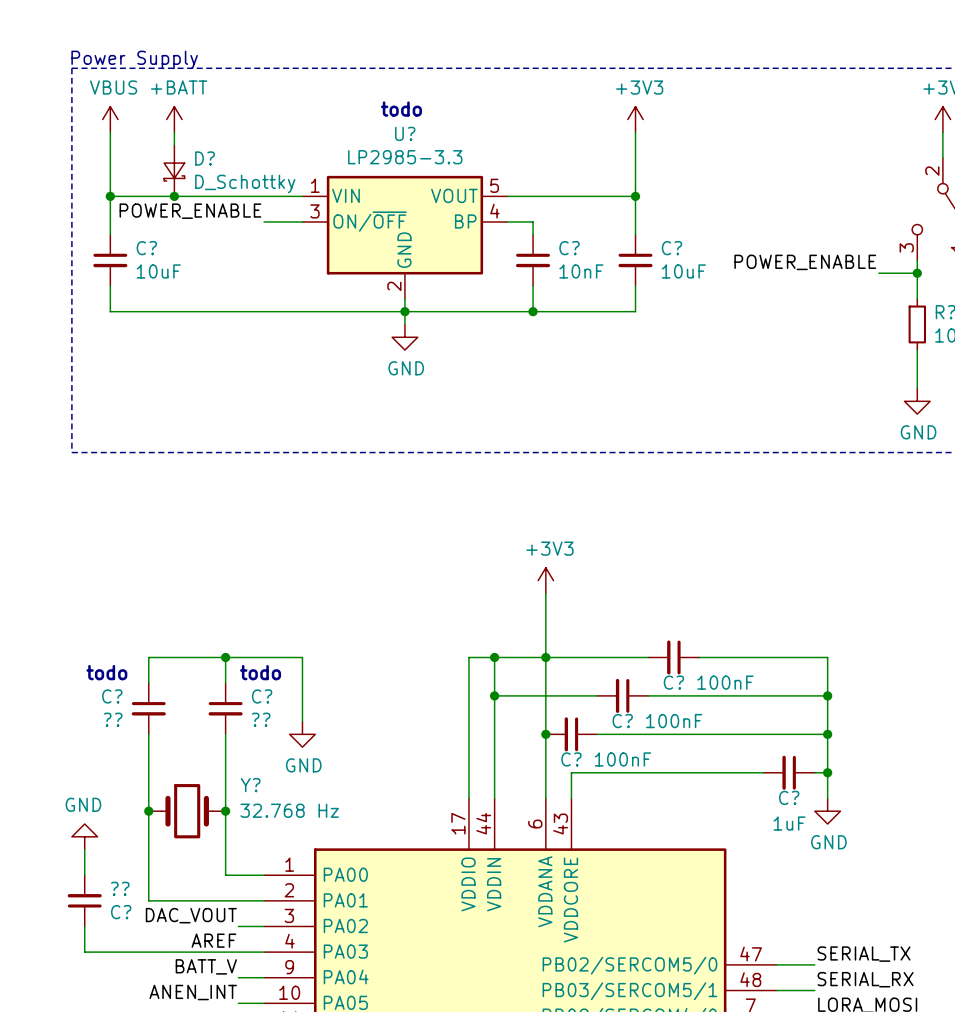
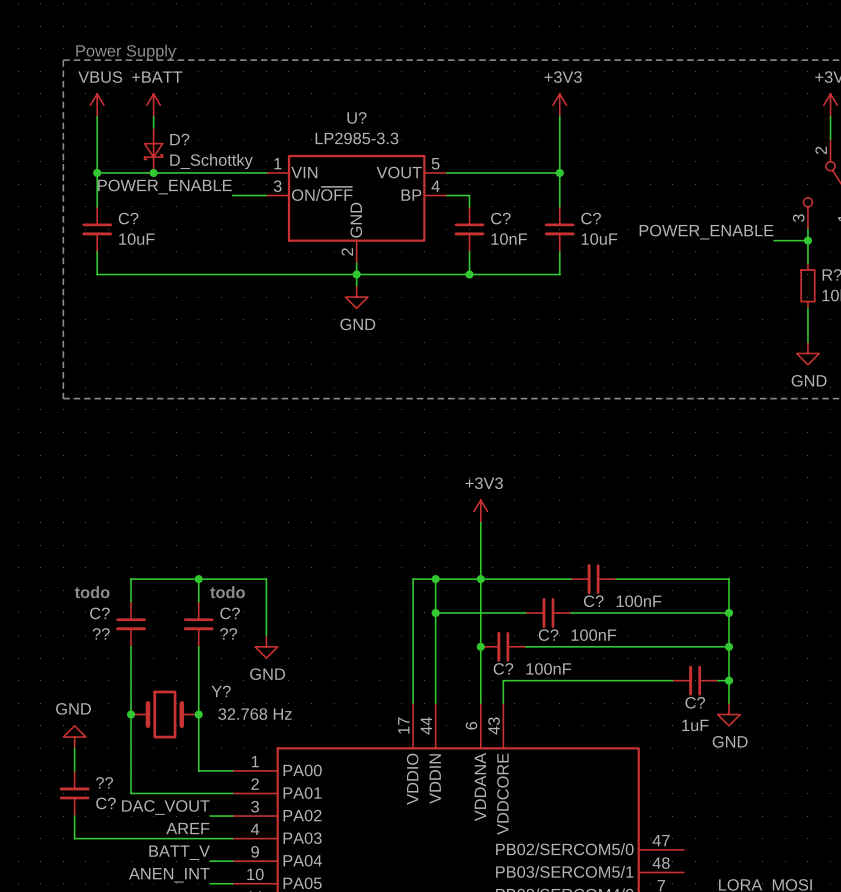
text: todo (401, 109) -> none
label: SERIAL_TX (864, 954) -> none
wire: (776, 964) (814, 964) -> none
label: SERIAL_RX (865, 979) -> none
wire: (776, 990) (814, 990) -> none

